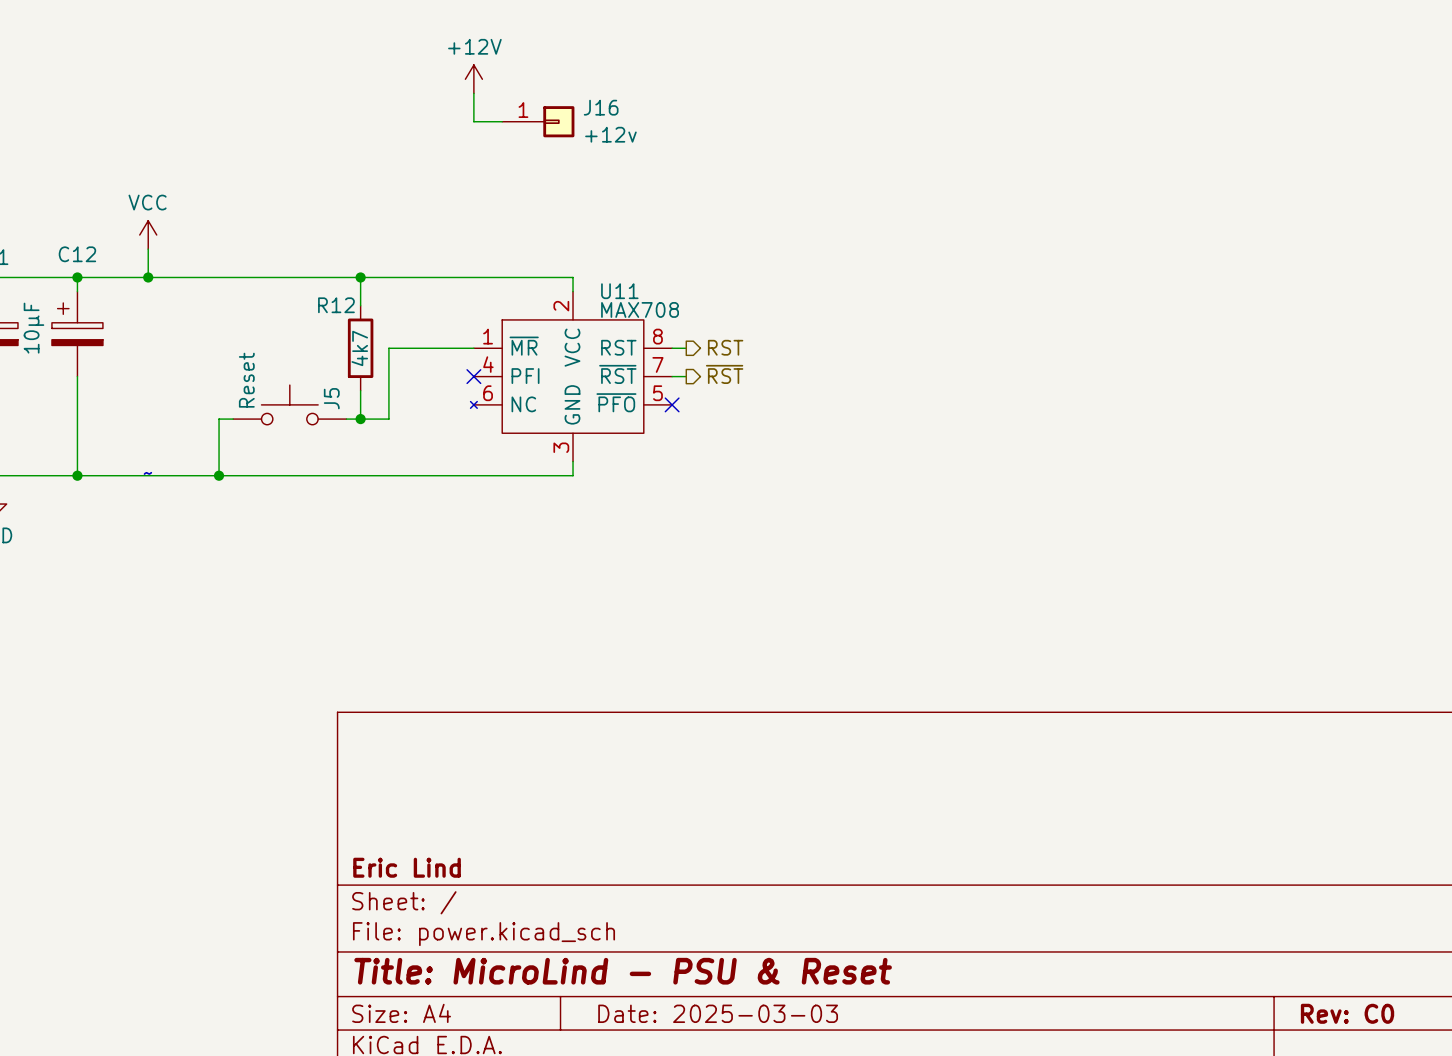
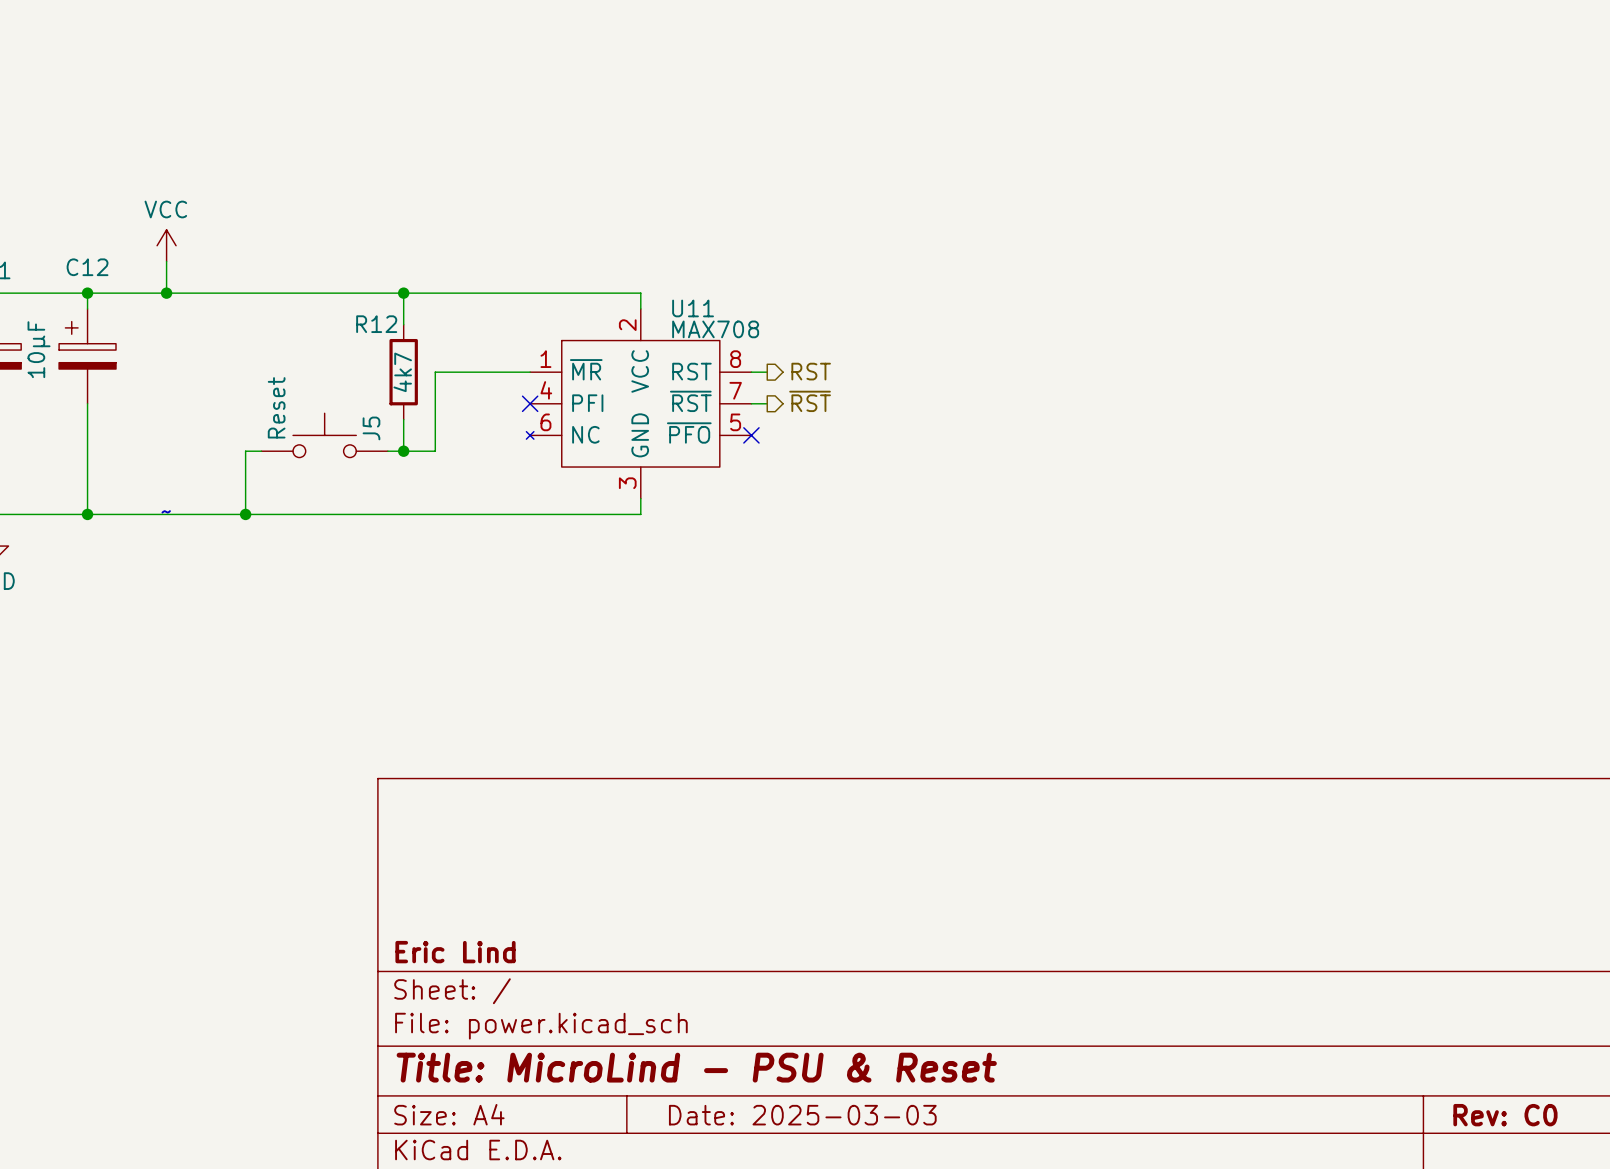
power symbol: +12V (473, 79) -> none
wire: (473, 93) (473, 121) (502, 121) -> none
J16: +12v (538, 121) -> none

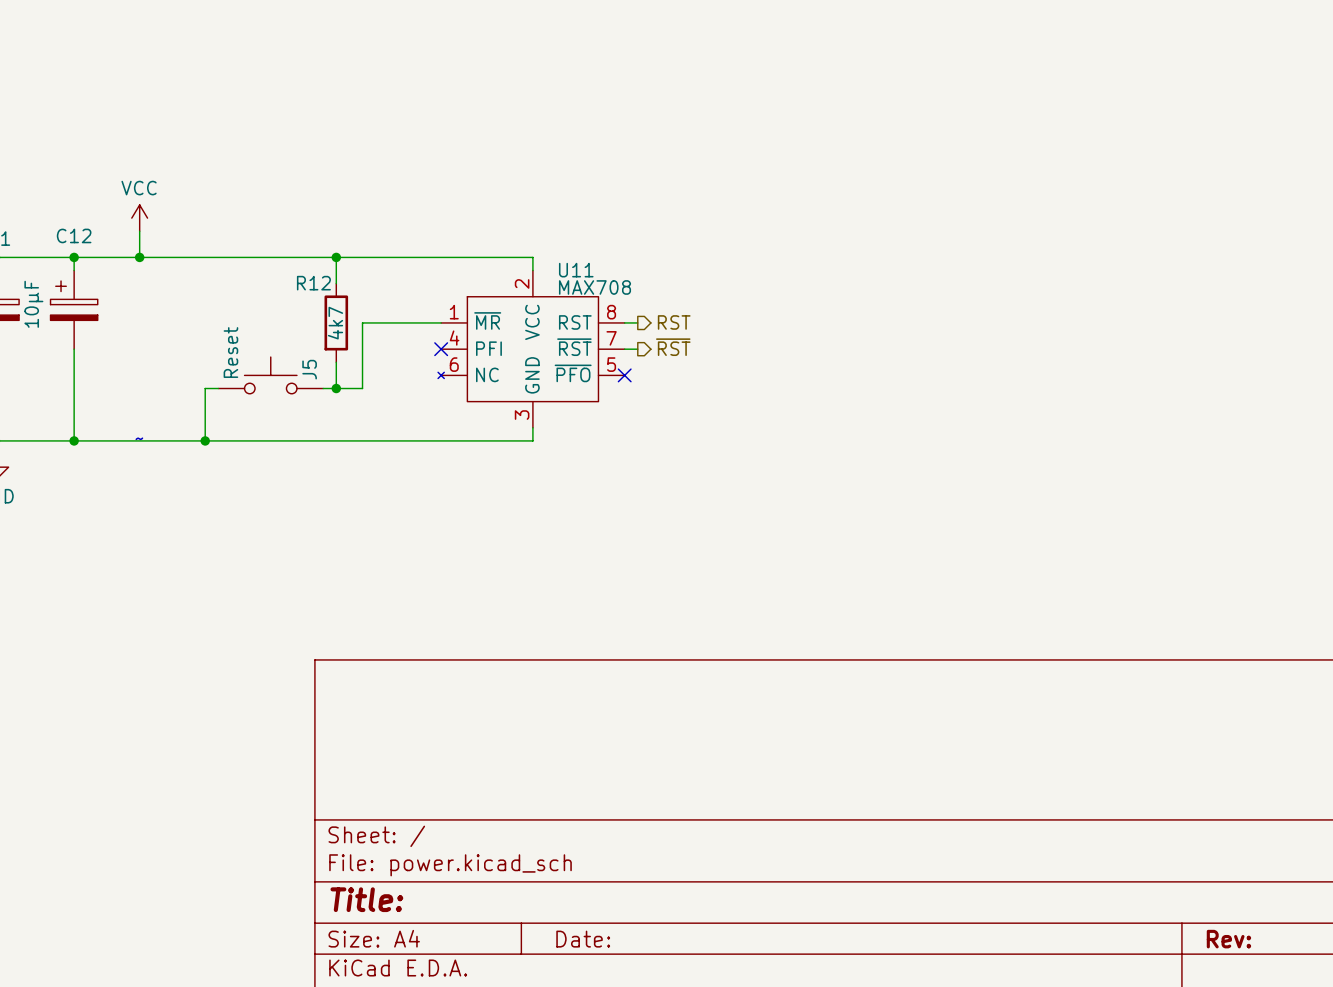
title block: Eric Lind (455, 952) -> none
title block: Title: MicroLind - PSU & Reset (696, 1067) -> Title: (366, 899)
title block: Date: 2025-03-03 (802, 1115) -> Date: (583, 939)
title block: Rev: C0 (1505, 1115) -> Rev: (1228, 939)

